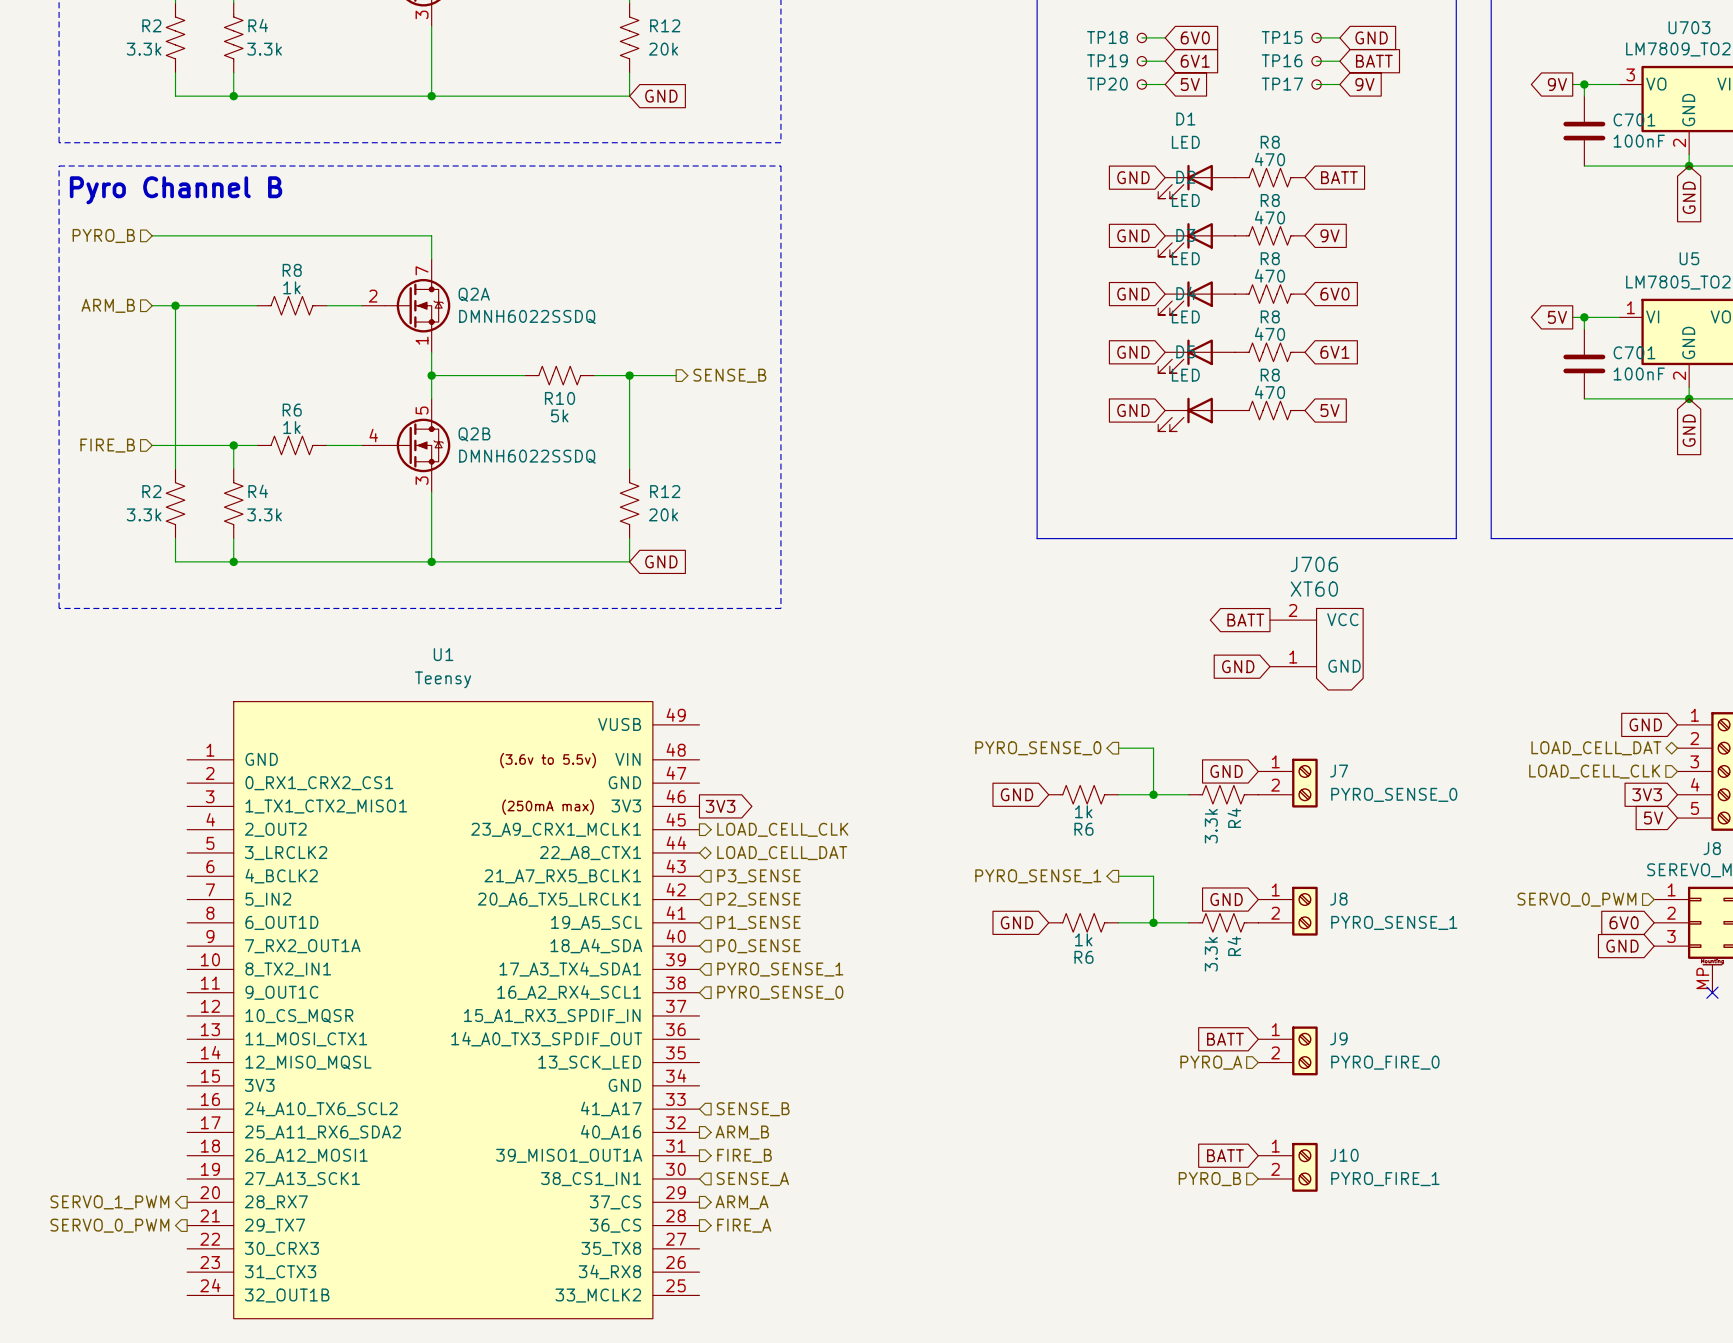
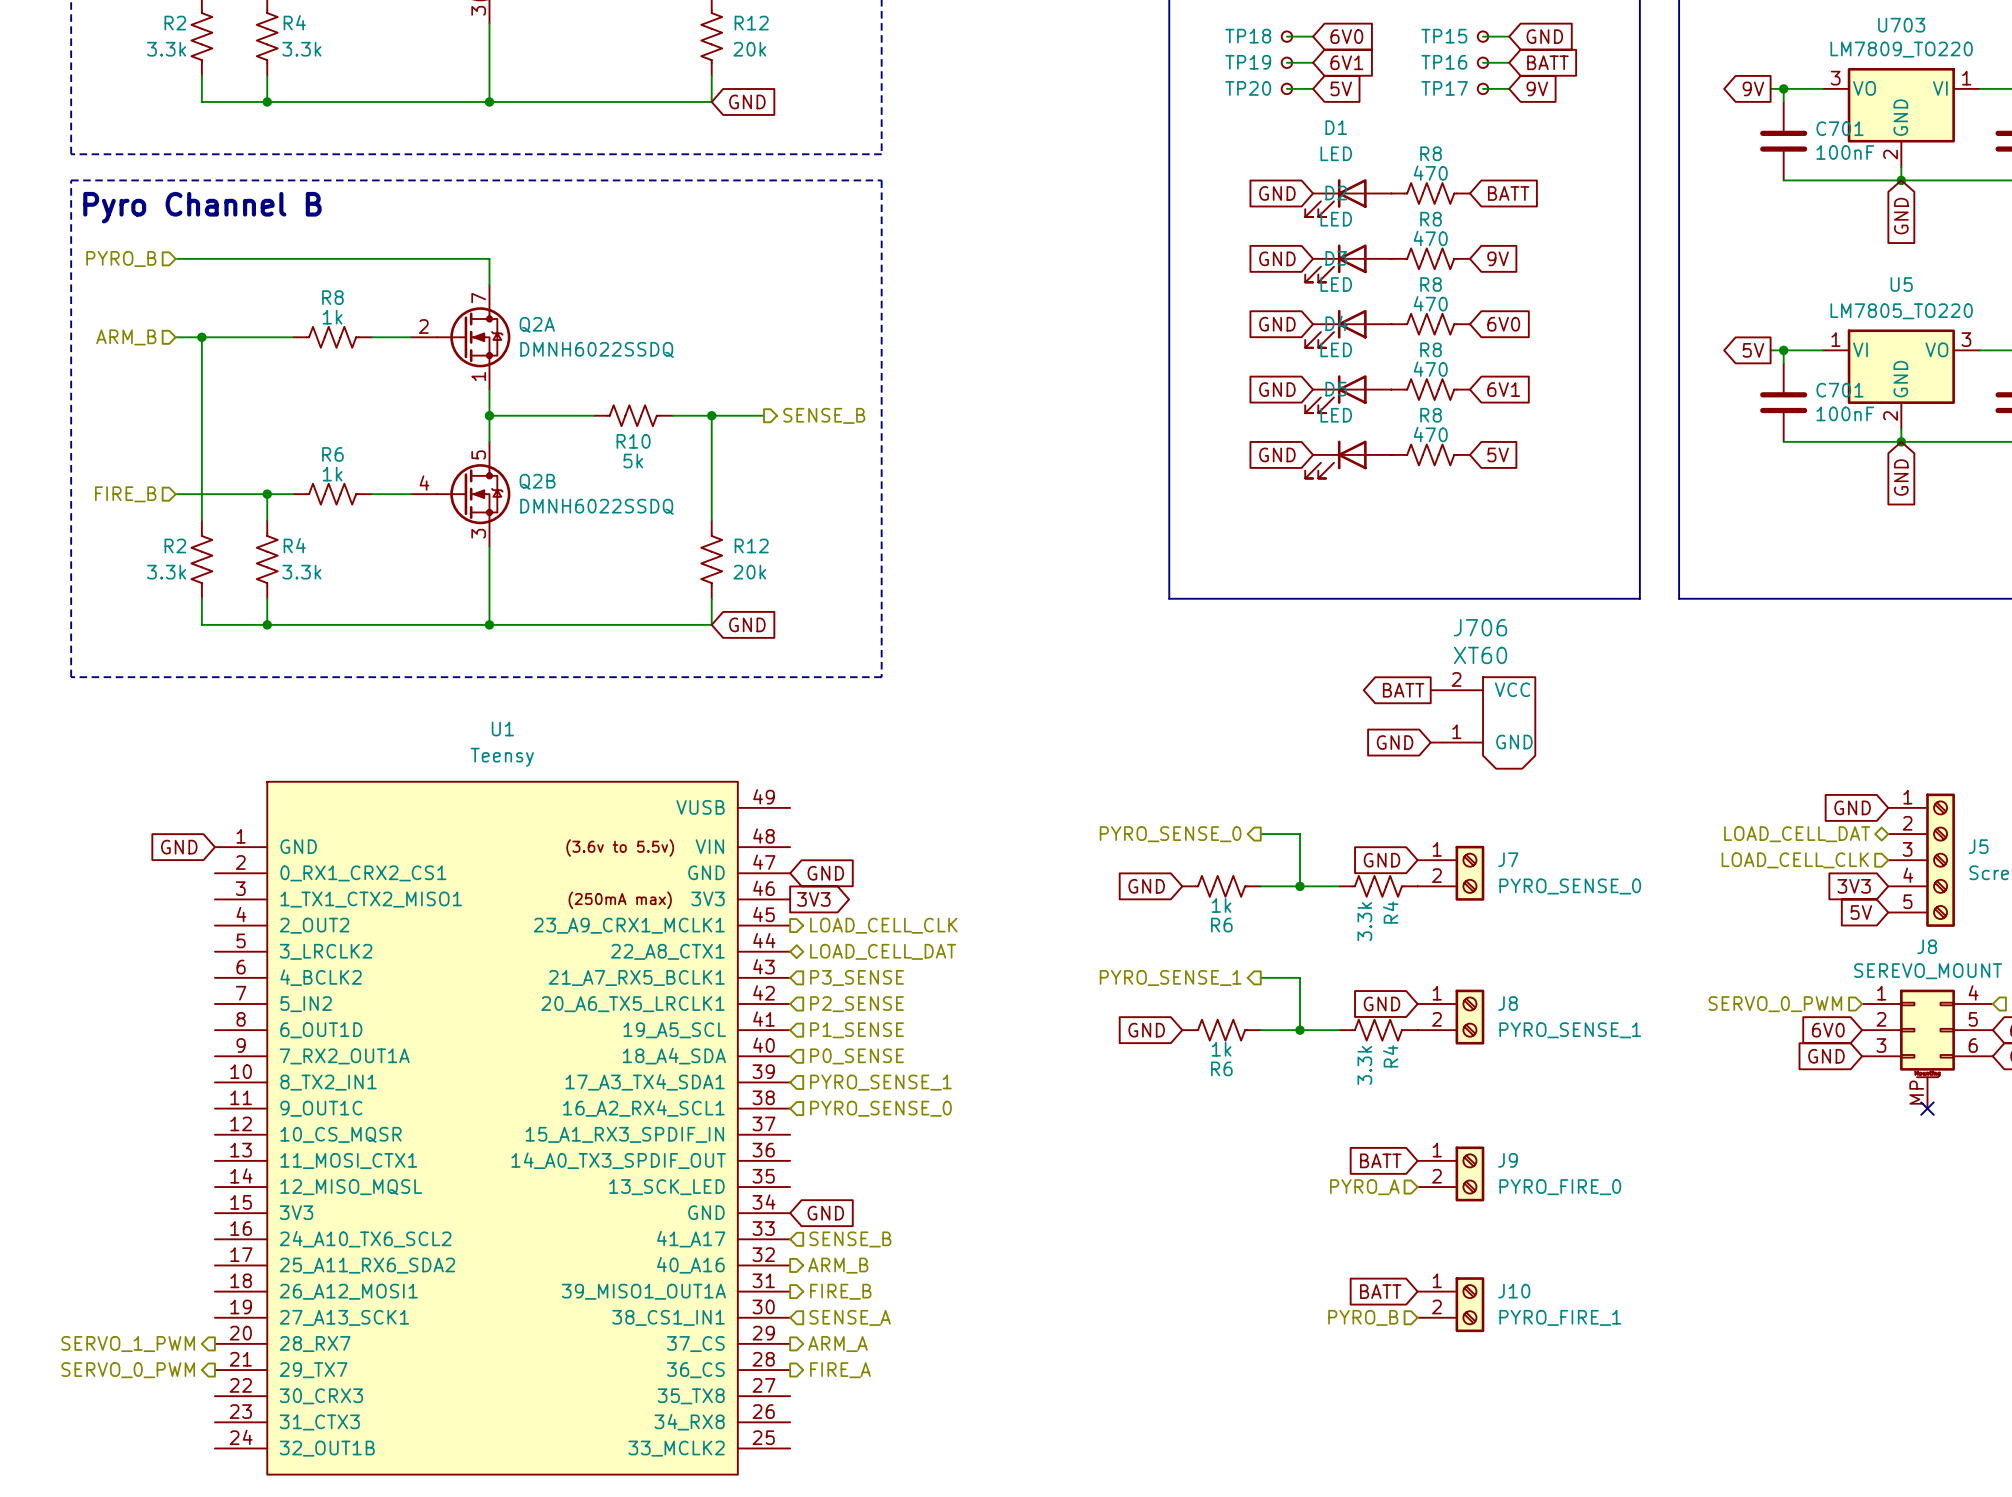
global label: none -> GND (179, 847)
global label: none -> GND (825, 873)
global label: none -> GND (825, 1213)

